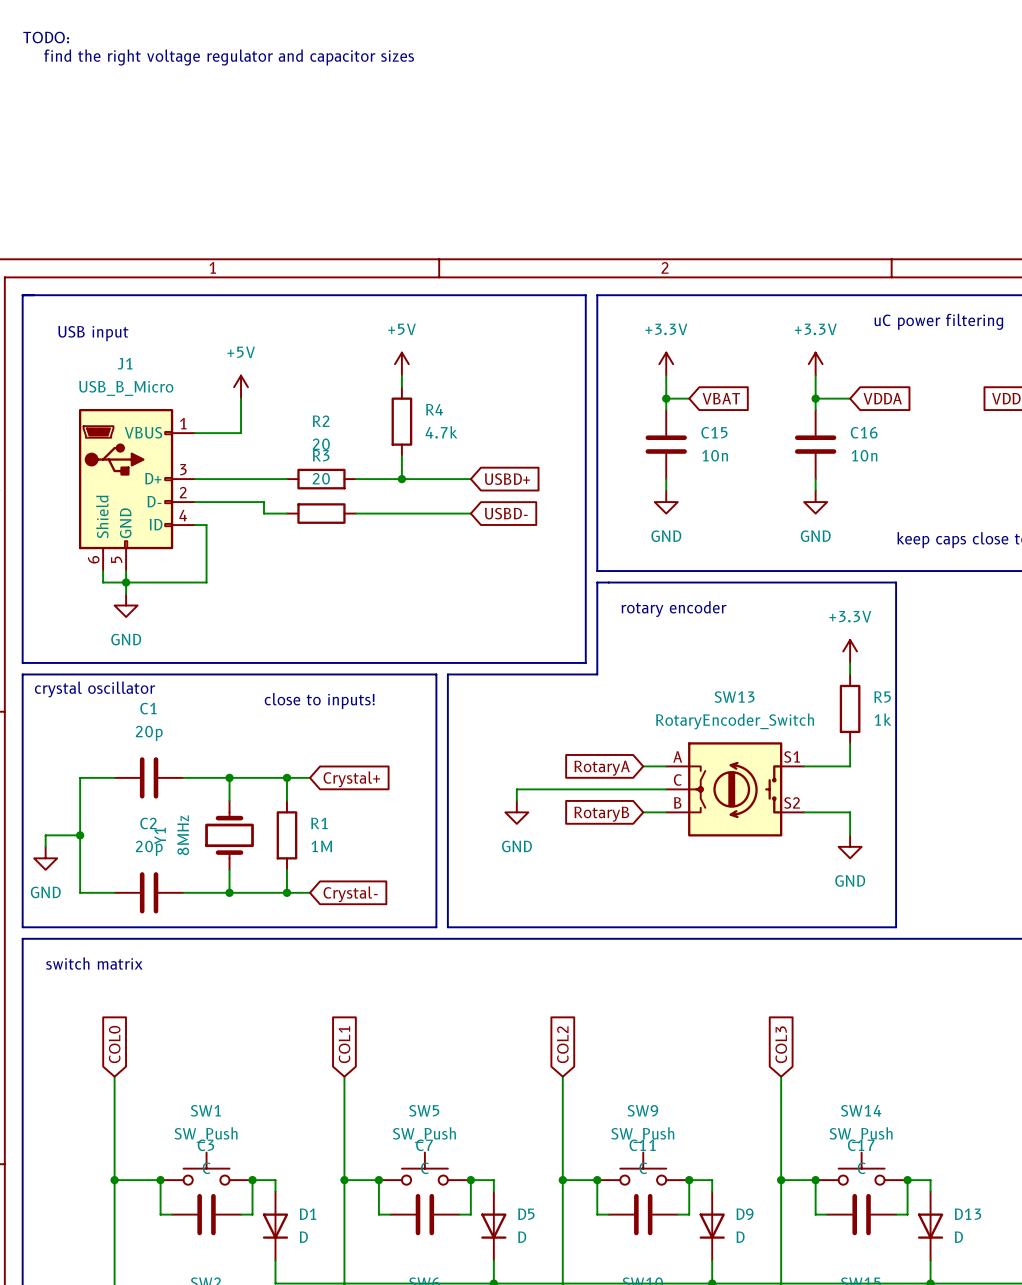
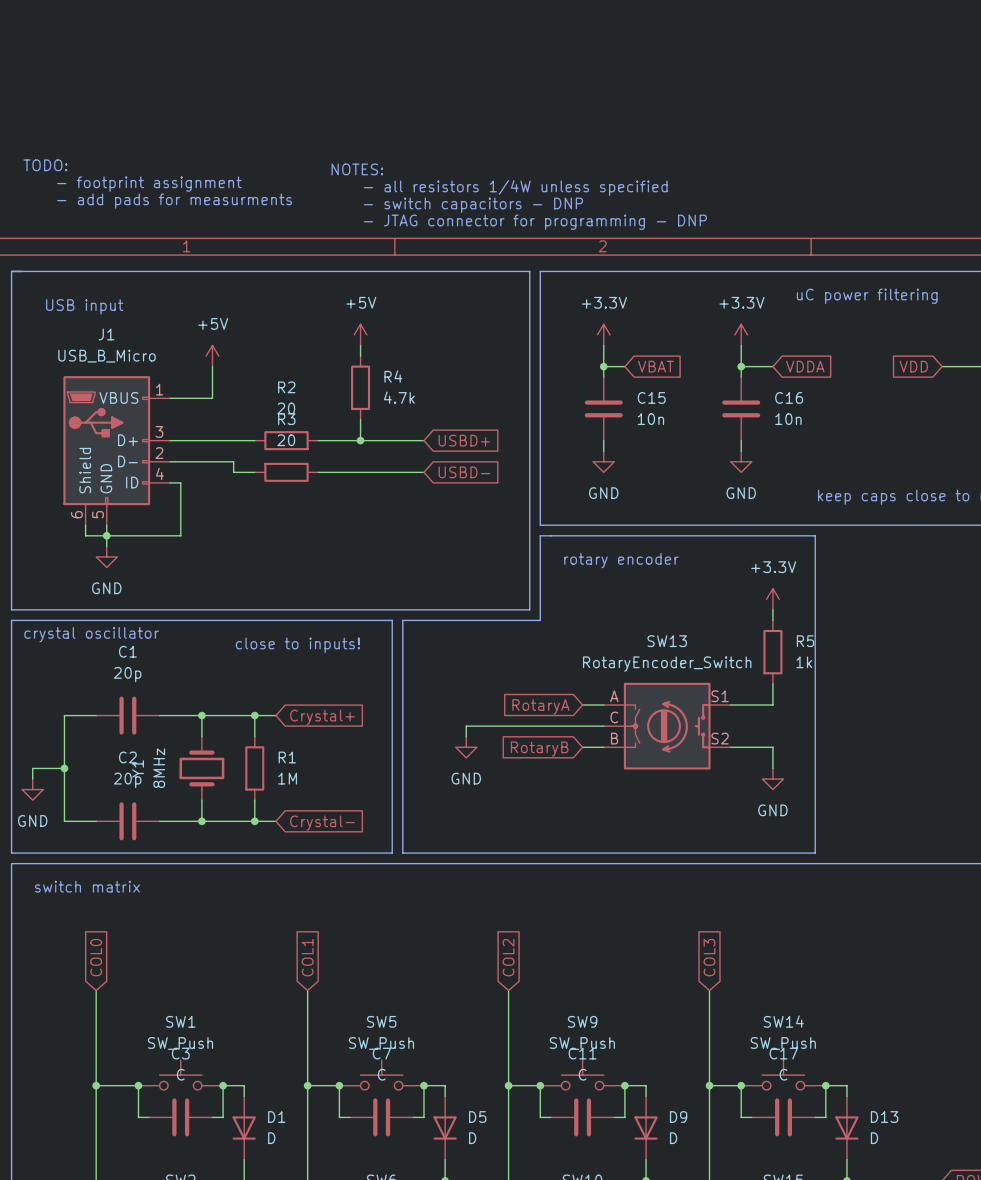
text position: TODO: (46, 37) -> TODO: (45, 165)
text: find the right voltage regulator and capacitor sizes (229, 57) -> none
text: none -> NOTES: (357, 169)
text: none -> - footprint assignment (149, 184)
text: none -> - all resistors 1/4W unless specified (515, 187)
text: none -> - add pads for measurments (174, 201)
text: none -> - switch capacitors - DNP (473, 205)
text: none -> - JTAG connector for programming - DNP (535, 222)

